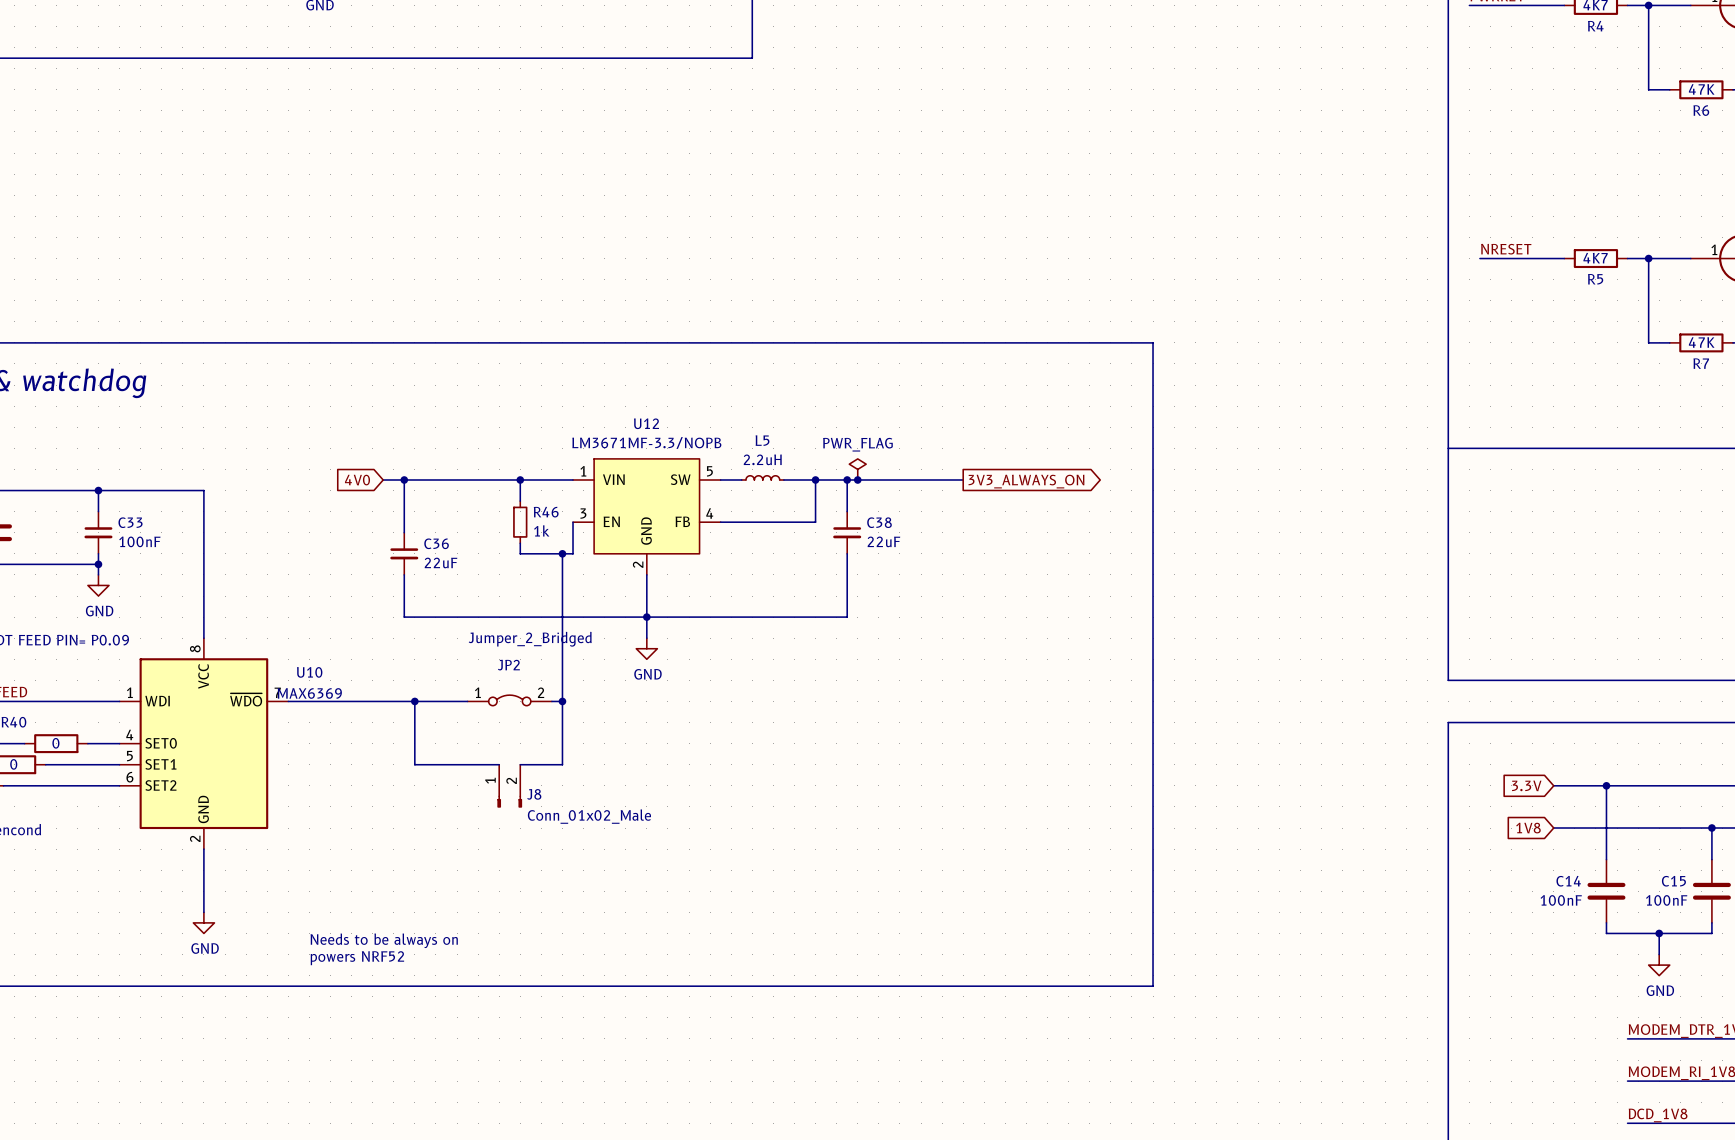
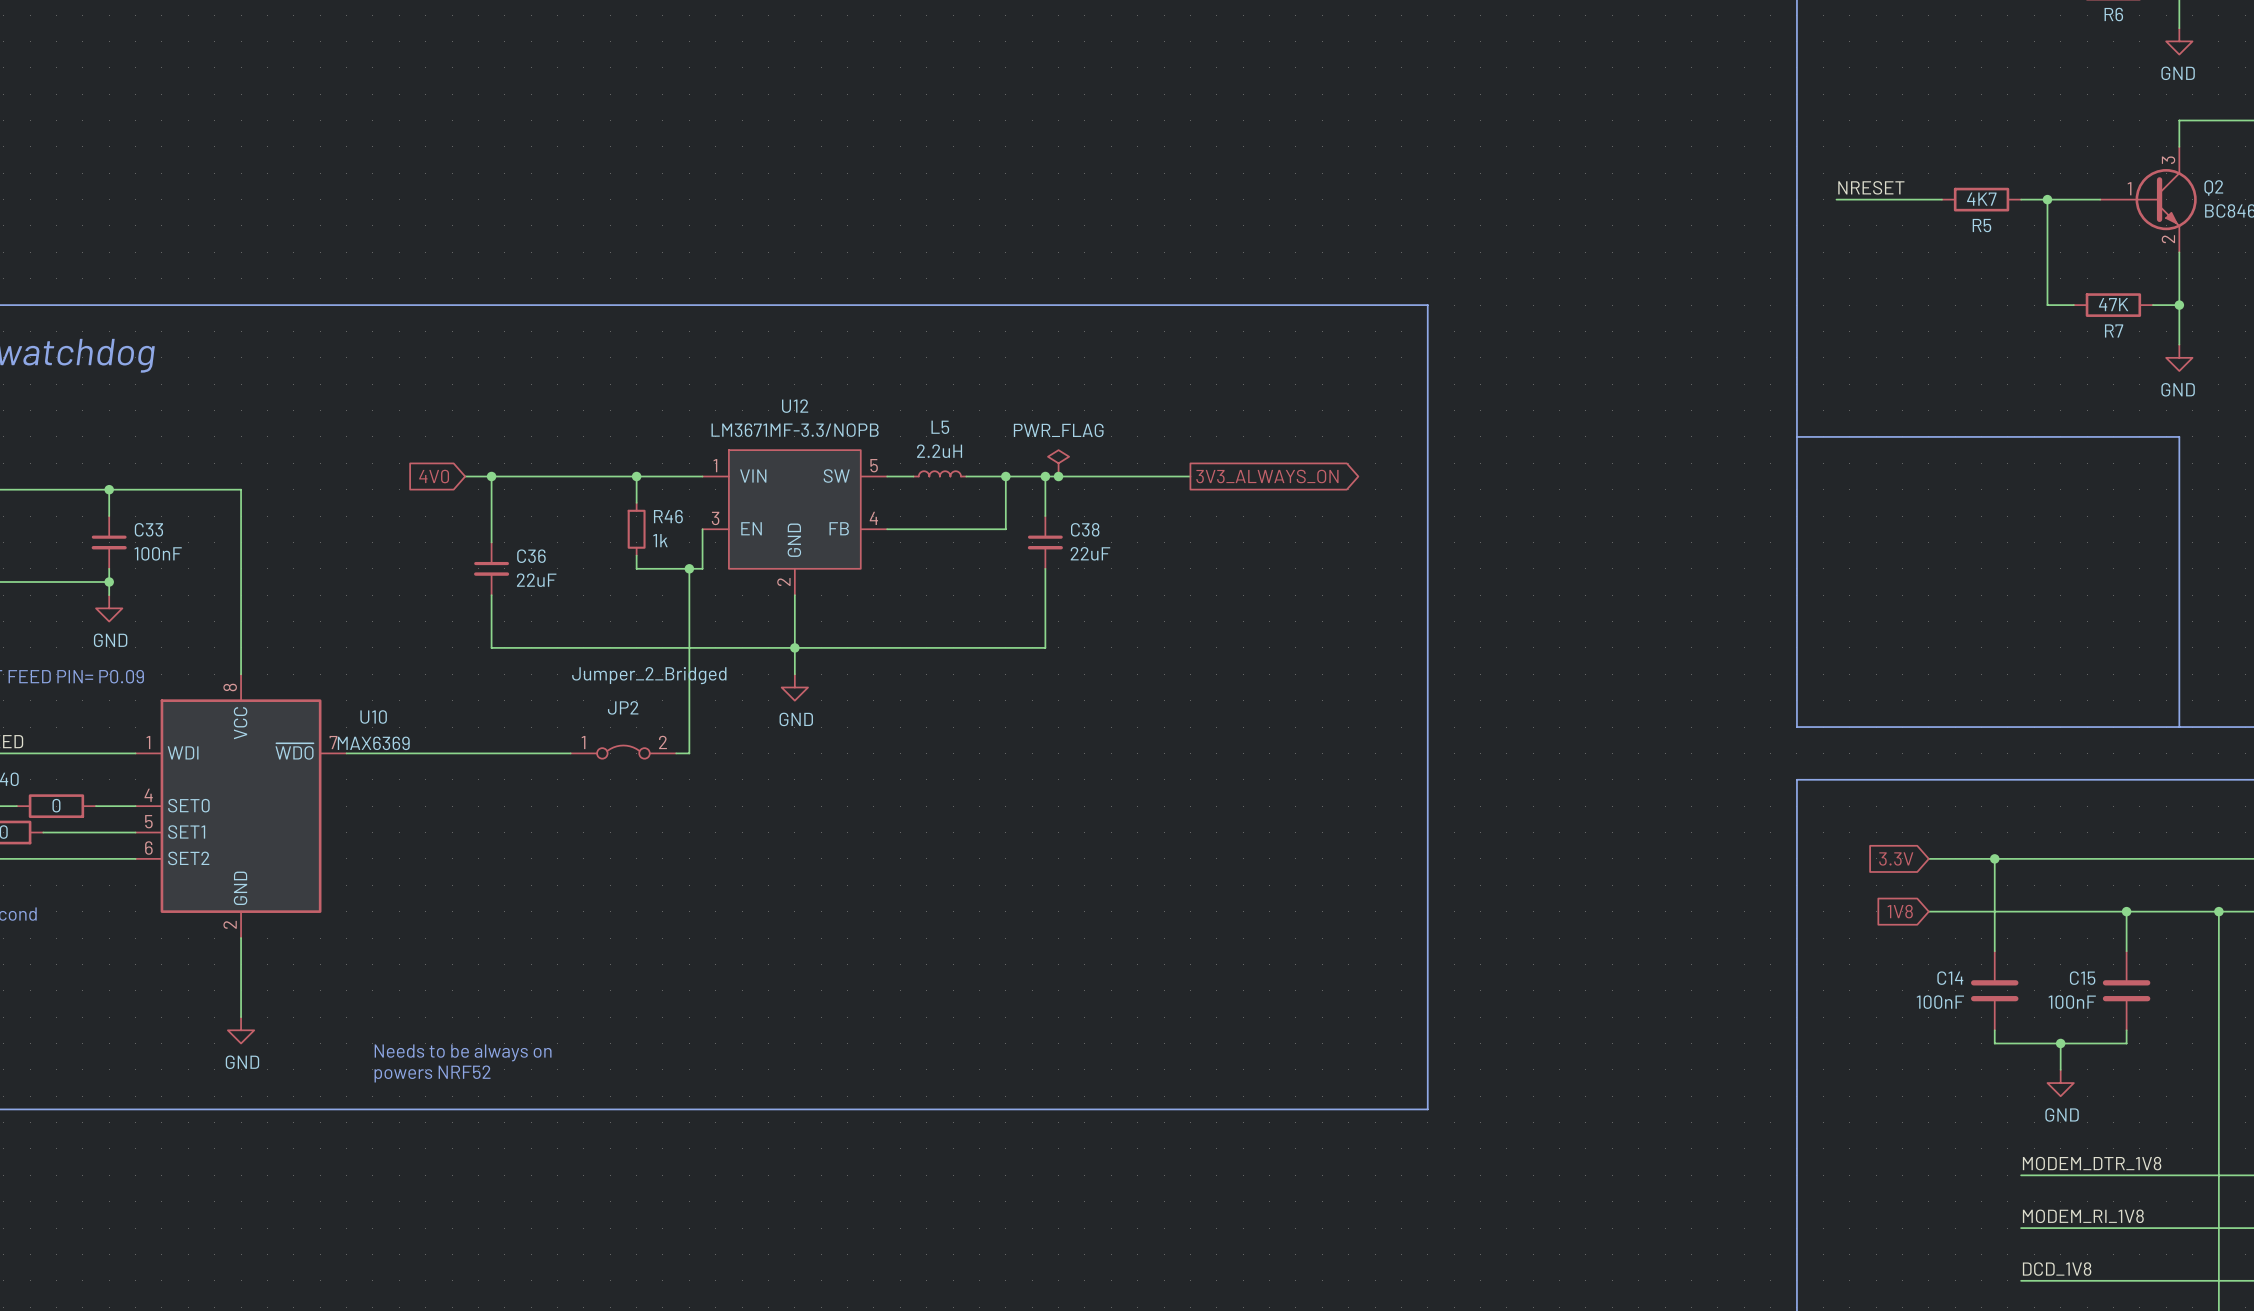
wire: (414, 701) (414, 764) (499, 764) -> none
junction: (414, 701) -> none
wire: (562, 701) (562, 764) (520, 764) -> none
junction: (562, 701) -> none
J8: Conn_01x02_Male (509, 786) -> none

